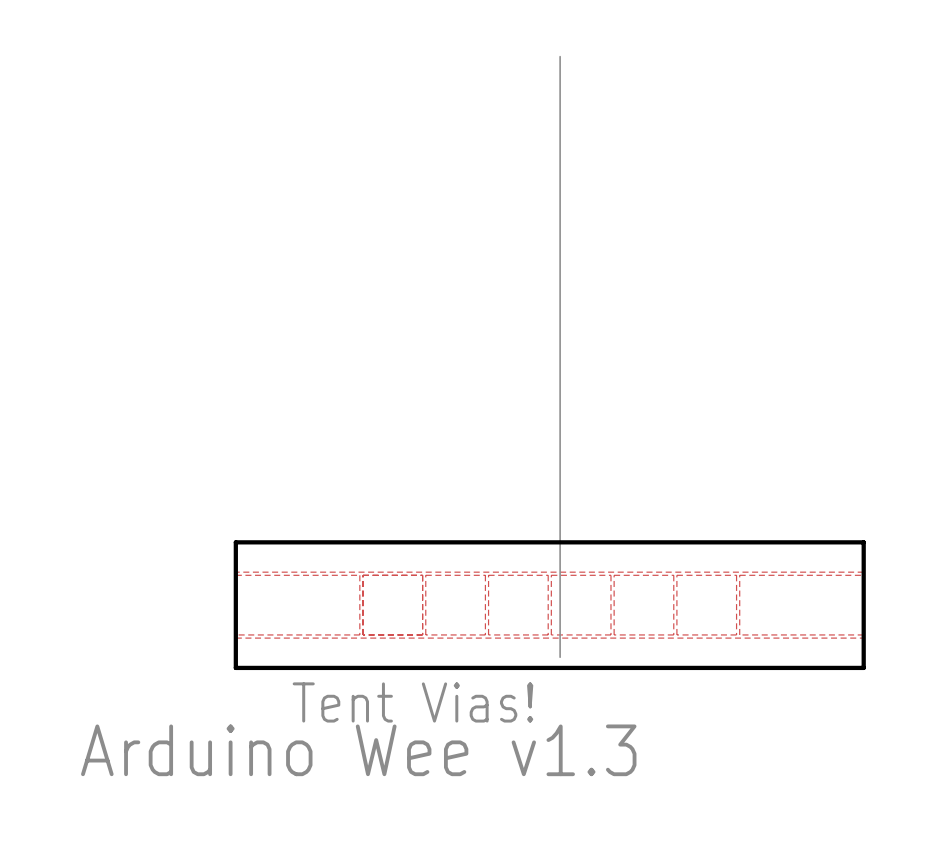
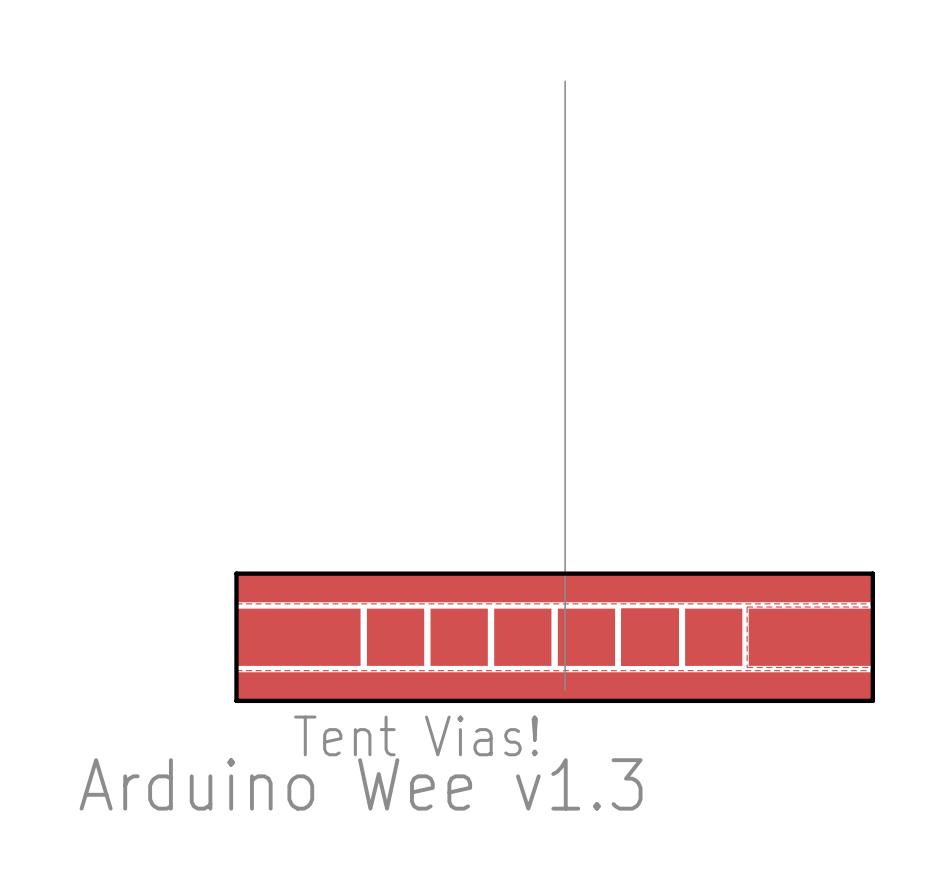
drawing: none -> [236, 573, 873, 701]
zone outline: (235, 575) (235, 634) (359, 634) (359, 575) (235, 575) -> none
zone outline: (362, 575) (422, 575) (422, 634) (362, 634) (362, 575) -> none
zone outline: (425, 575) (485, 575) (485, 634) (425, 634) (425, 575) -> none
zone outline: (488, 575) (548, 575) (548, 634) (488, 634) (488, 575) -> none
zone outline: (551, 575) (610, 575) (610, 634) (551, 634) (551, 575) -> none
zone outline: (614, 575) (673, 575) (673, 634) (614, 634) (614, 575) -> none
zone outline: (676, 575) (736, 575) (736, 634) (676, 634) (676, 575) -> none

